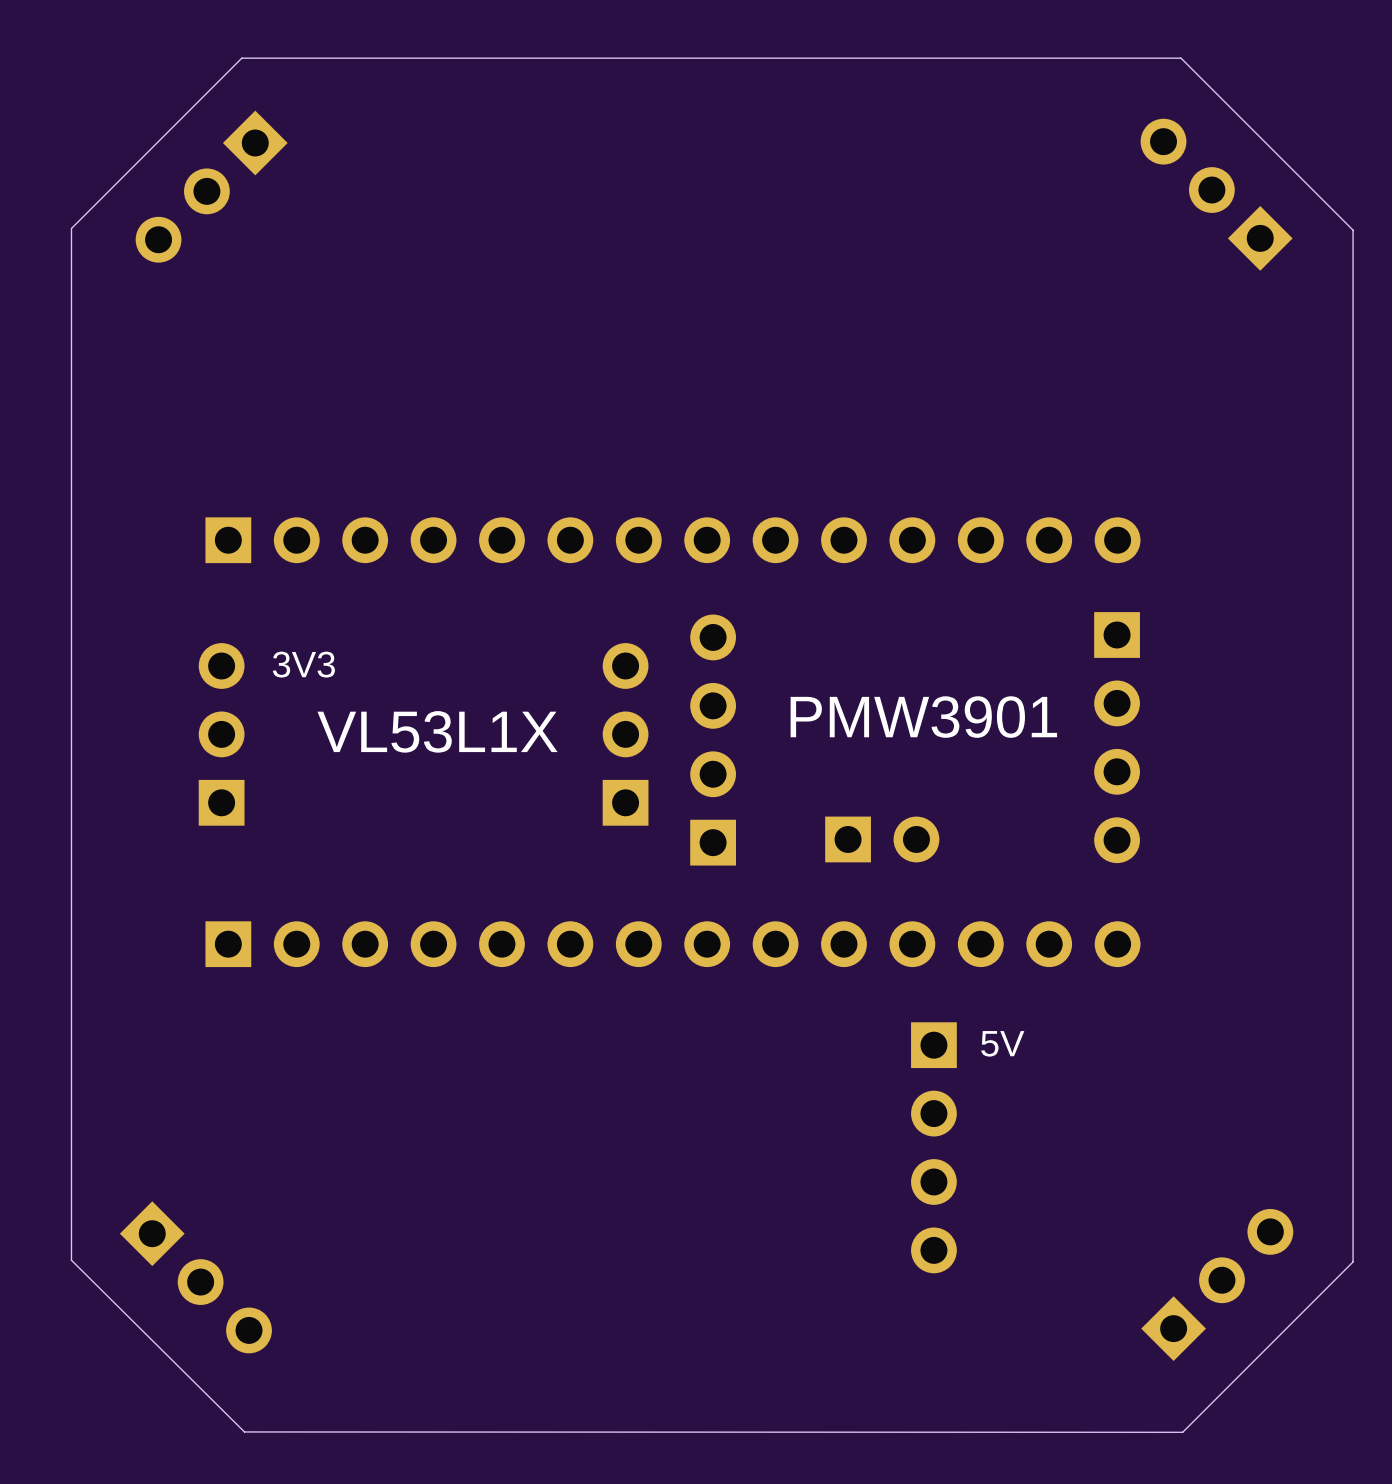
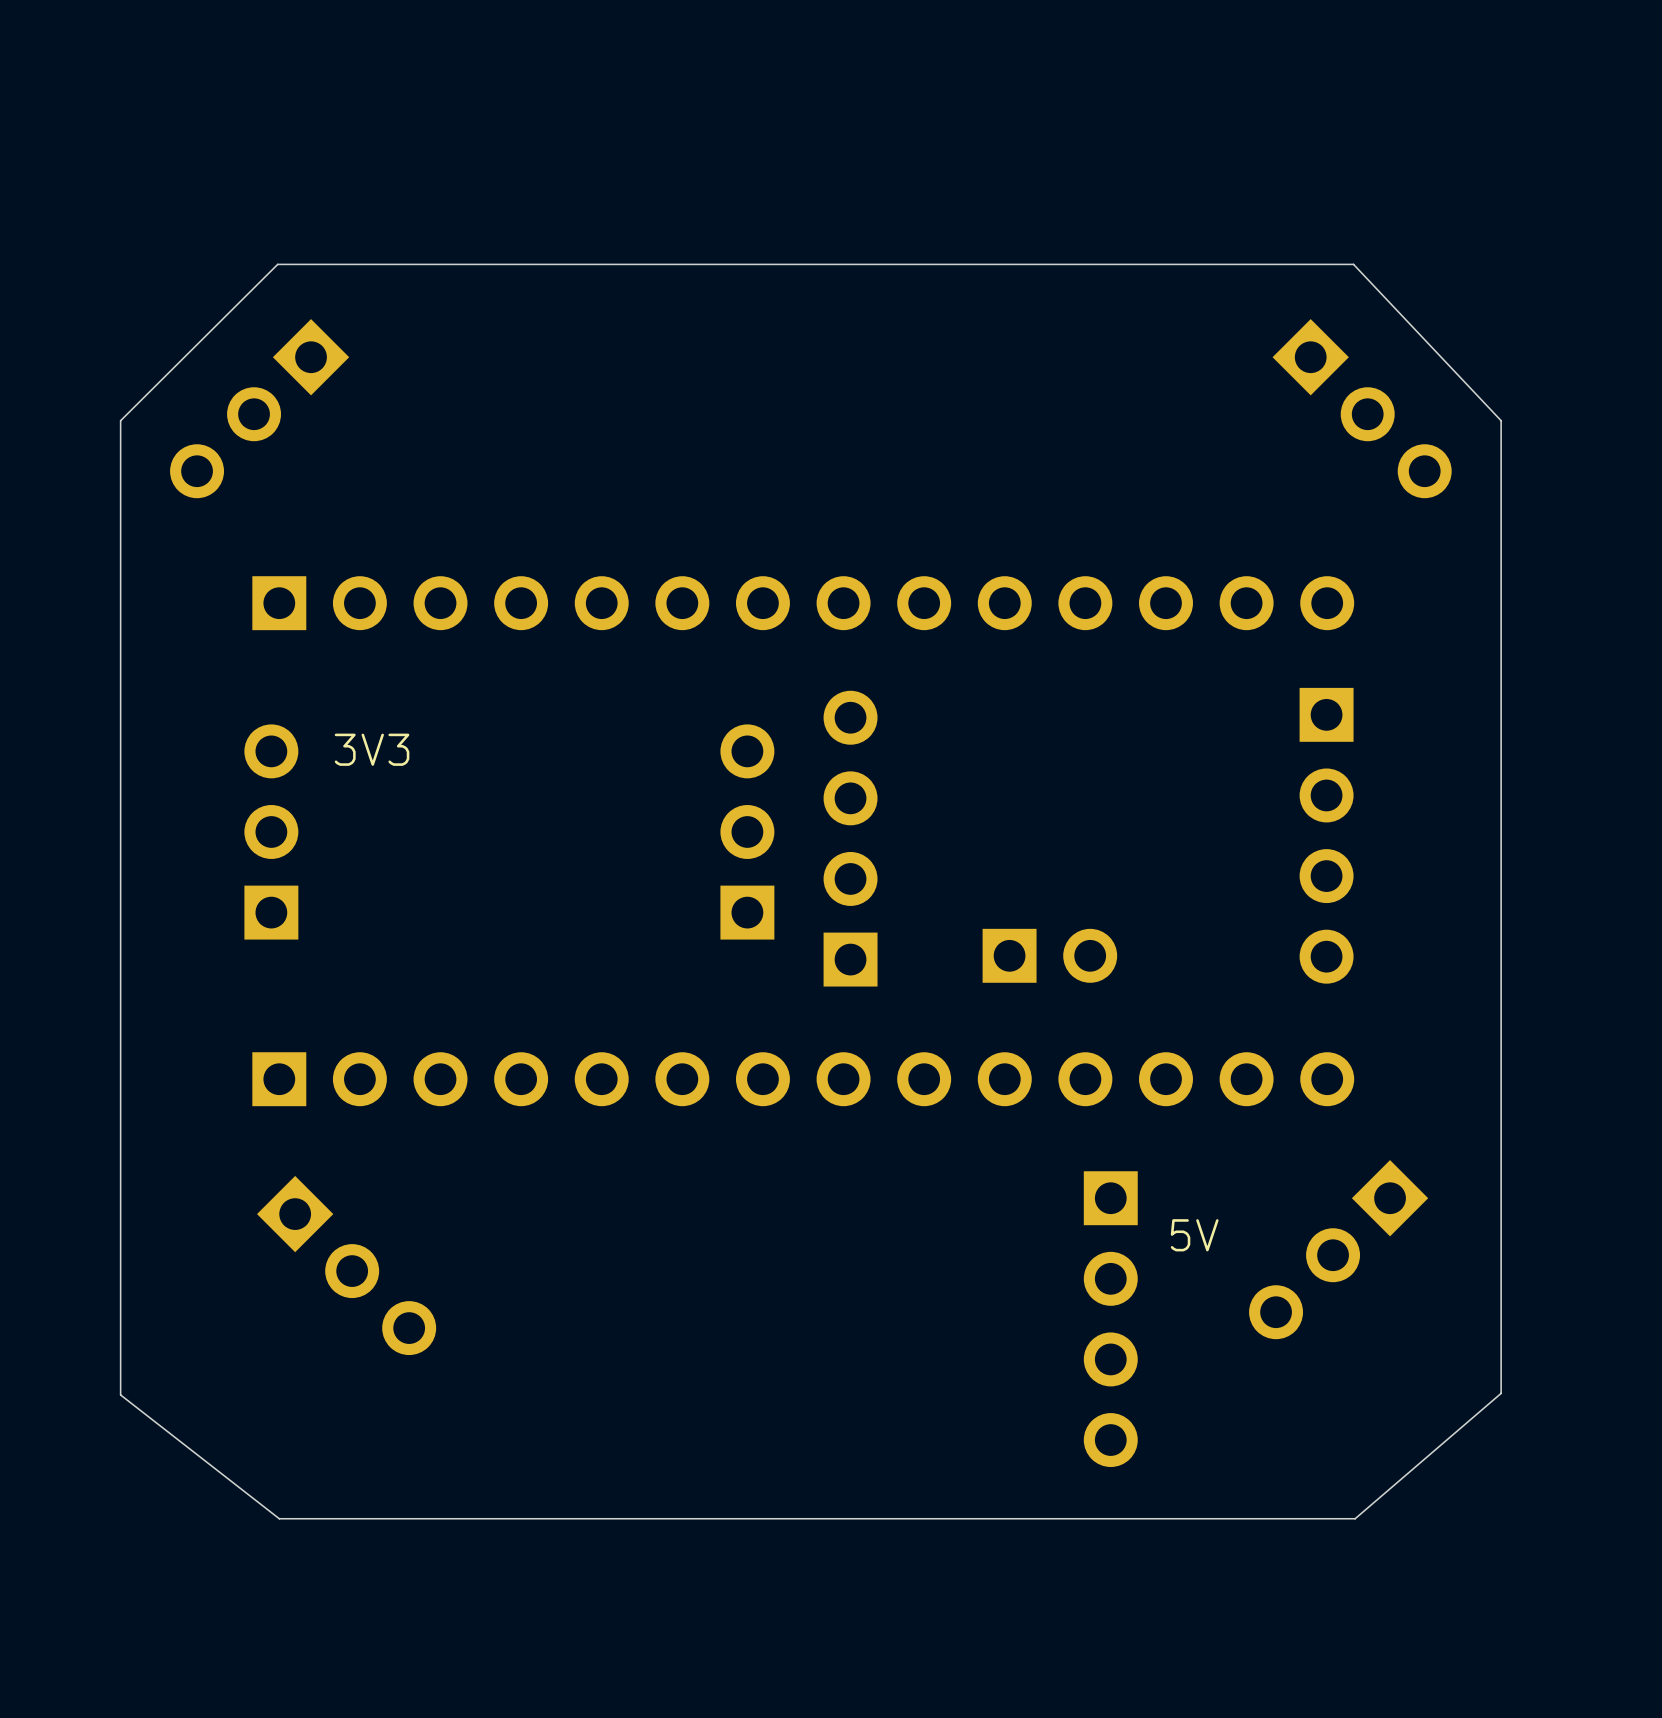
board edge: (1181, 58) (1353, 230) (1353, 1261) (1182, 1432) (244, 1431) (71, 1260) (71, 228) (241, 58) (1181, 58) -> (1353, 264) (1501, 420) (1501, 1393) (1355, 1518) (279, 1518) (120, 1394) (120, 420) (277, 264) (1353, 264)
part position: (211, 186) -> (259, 408)
part rotation: 0° (1216, 194) -> 180° (1362, 408)
part position: (1216, 194) -> (1362, 408)
text: PMW3901 (923, 717) -> none
text: VL53L1X (437, 731) -> none
text position: 5V (1002, 1043) -> 5V (1194, 1235)
part position: (195, 1277) -> (346, 1265)
part rotation: 0° (1217, 1284) -> 180° (1338, 1249)
part position: (1217, 1284) -> (1338, 1249)

